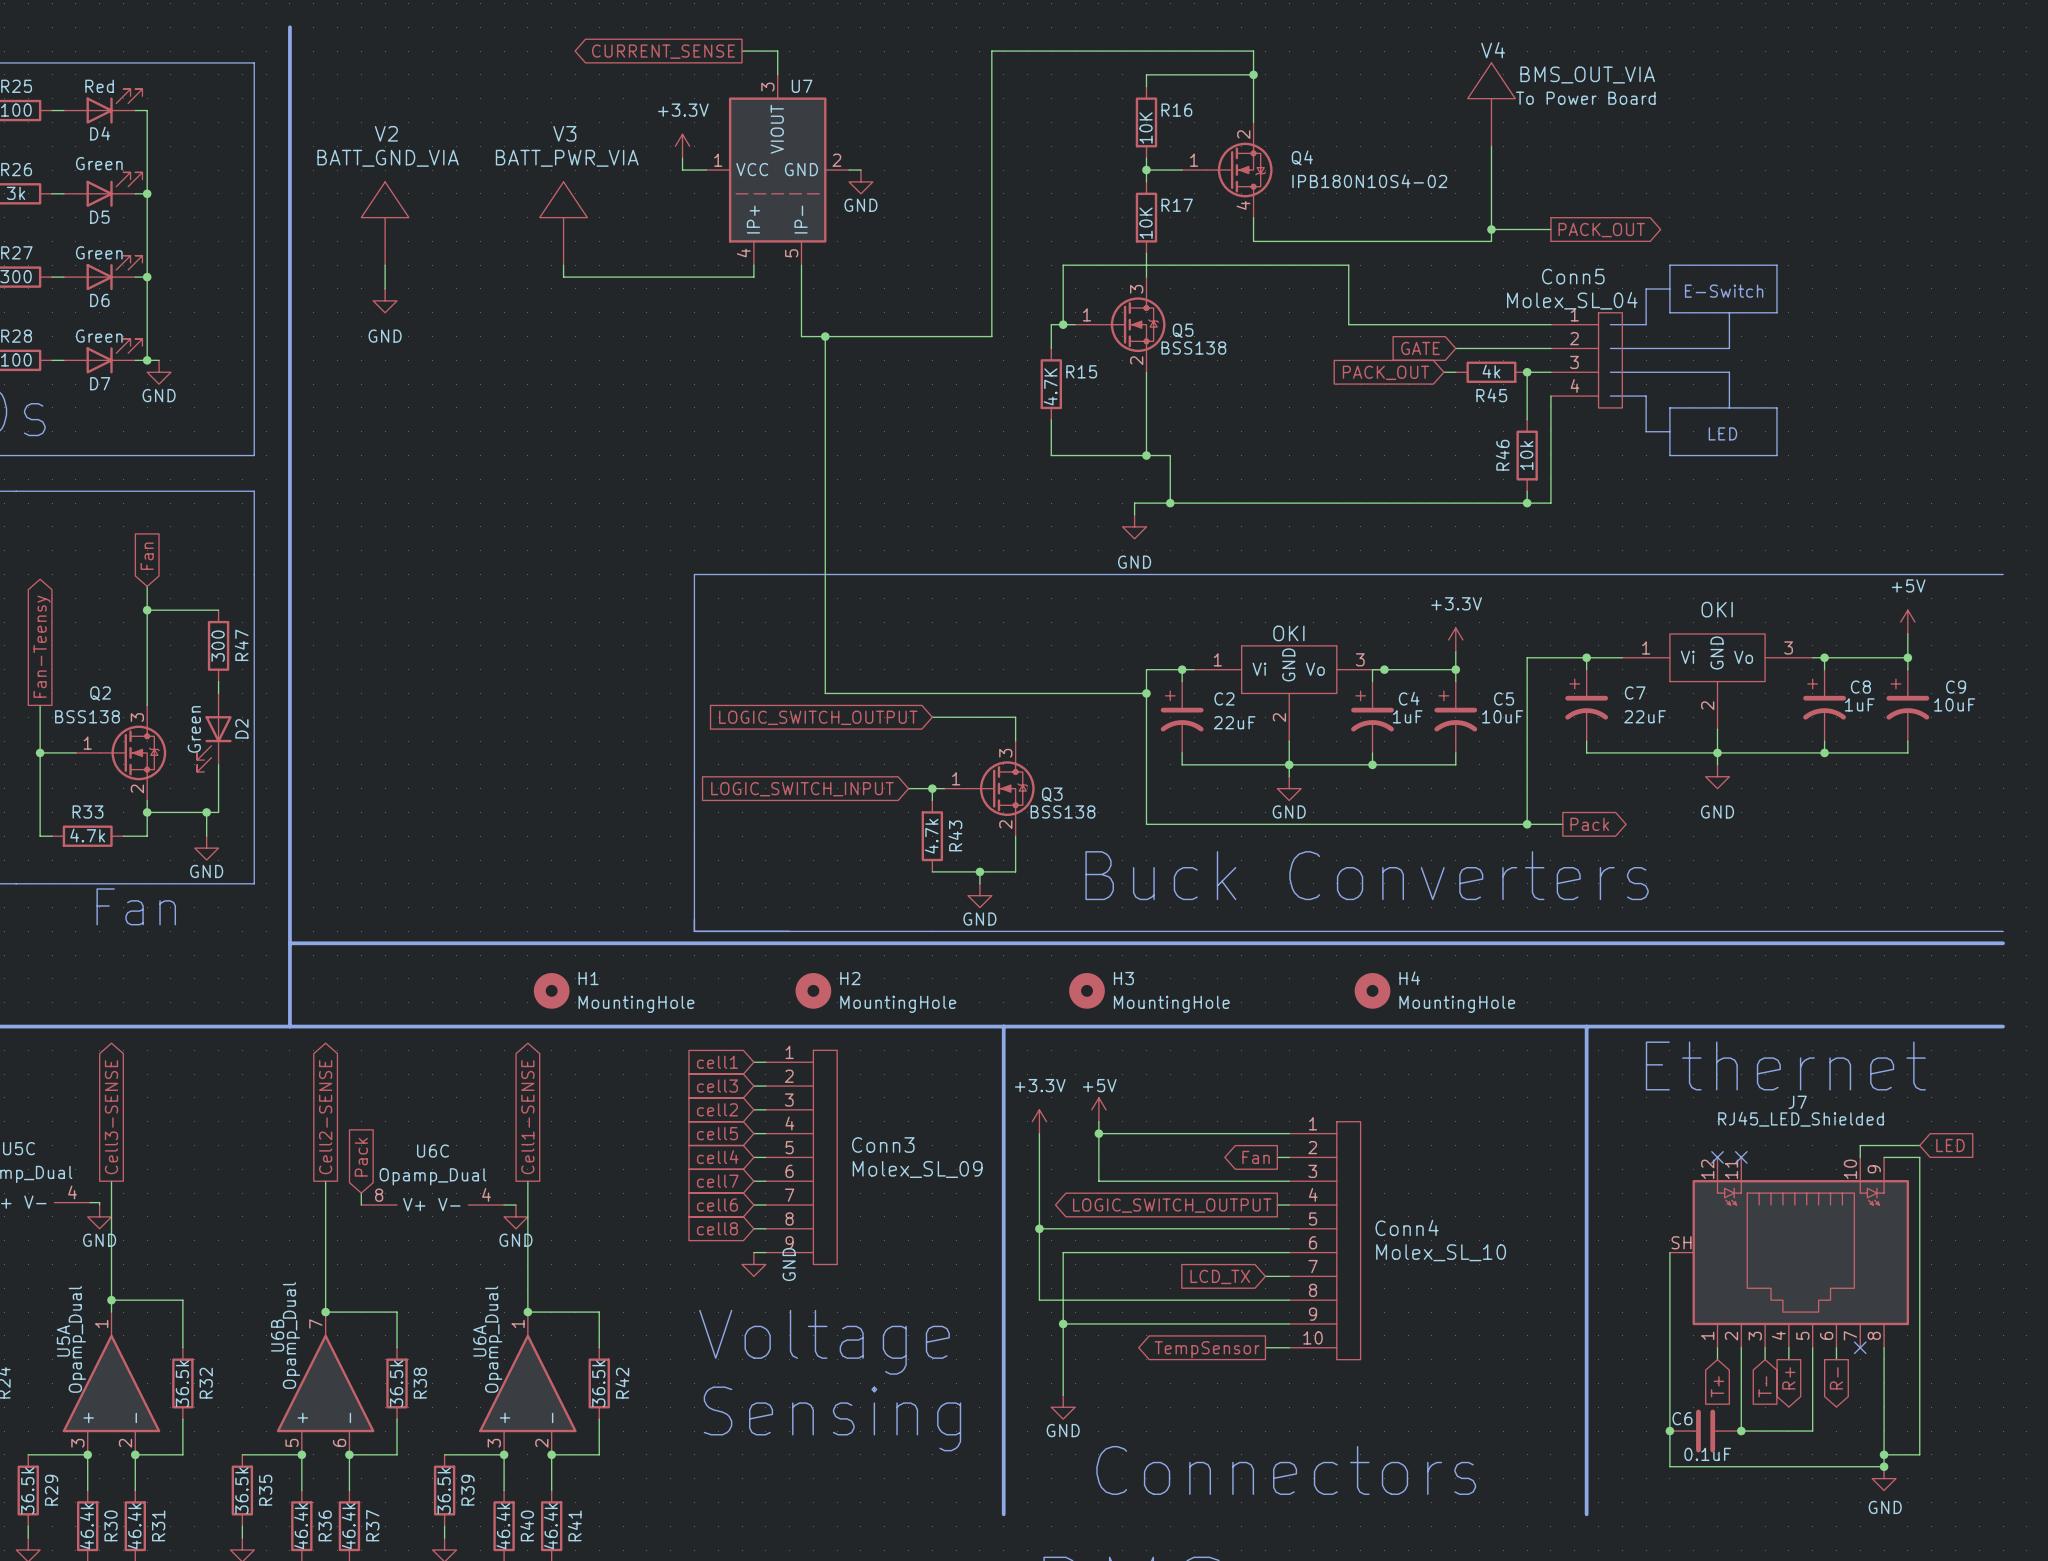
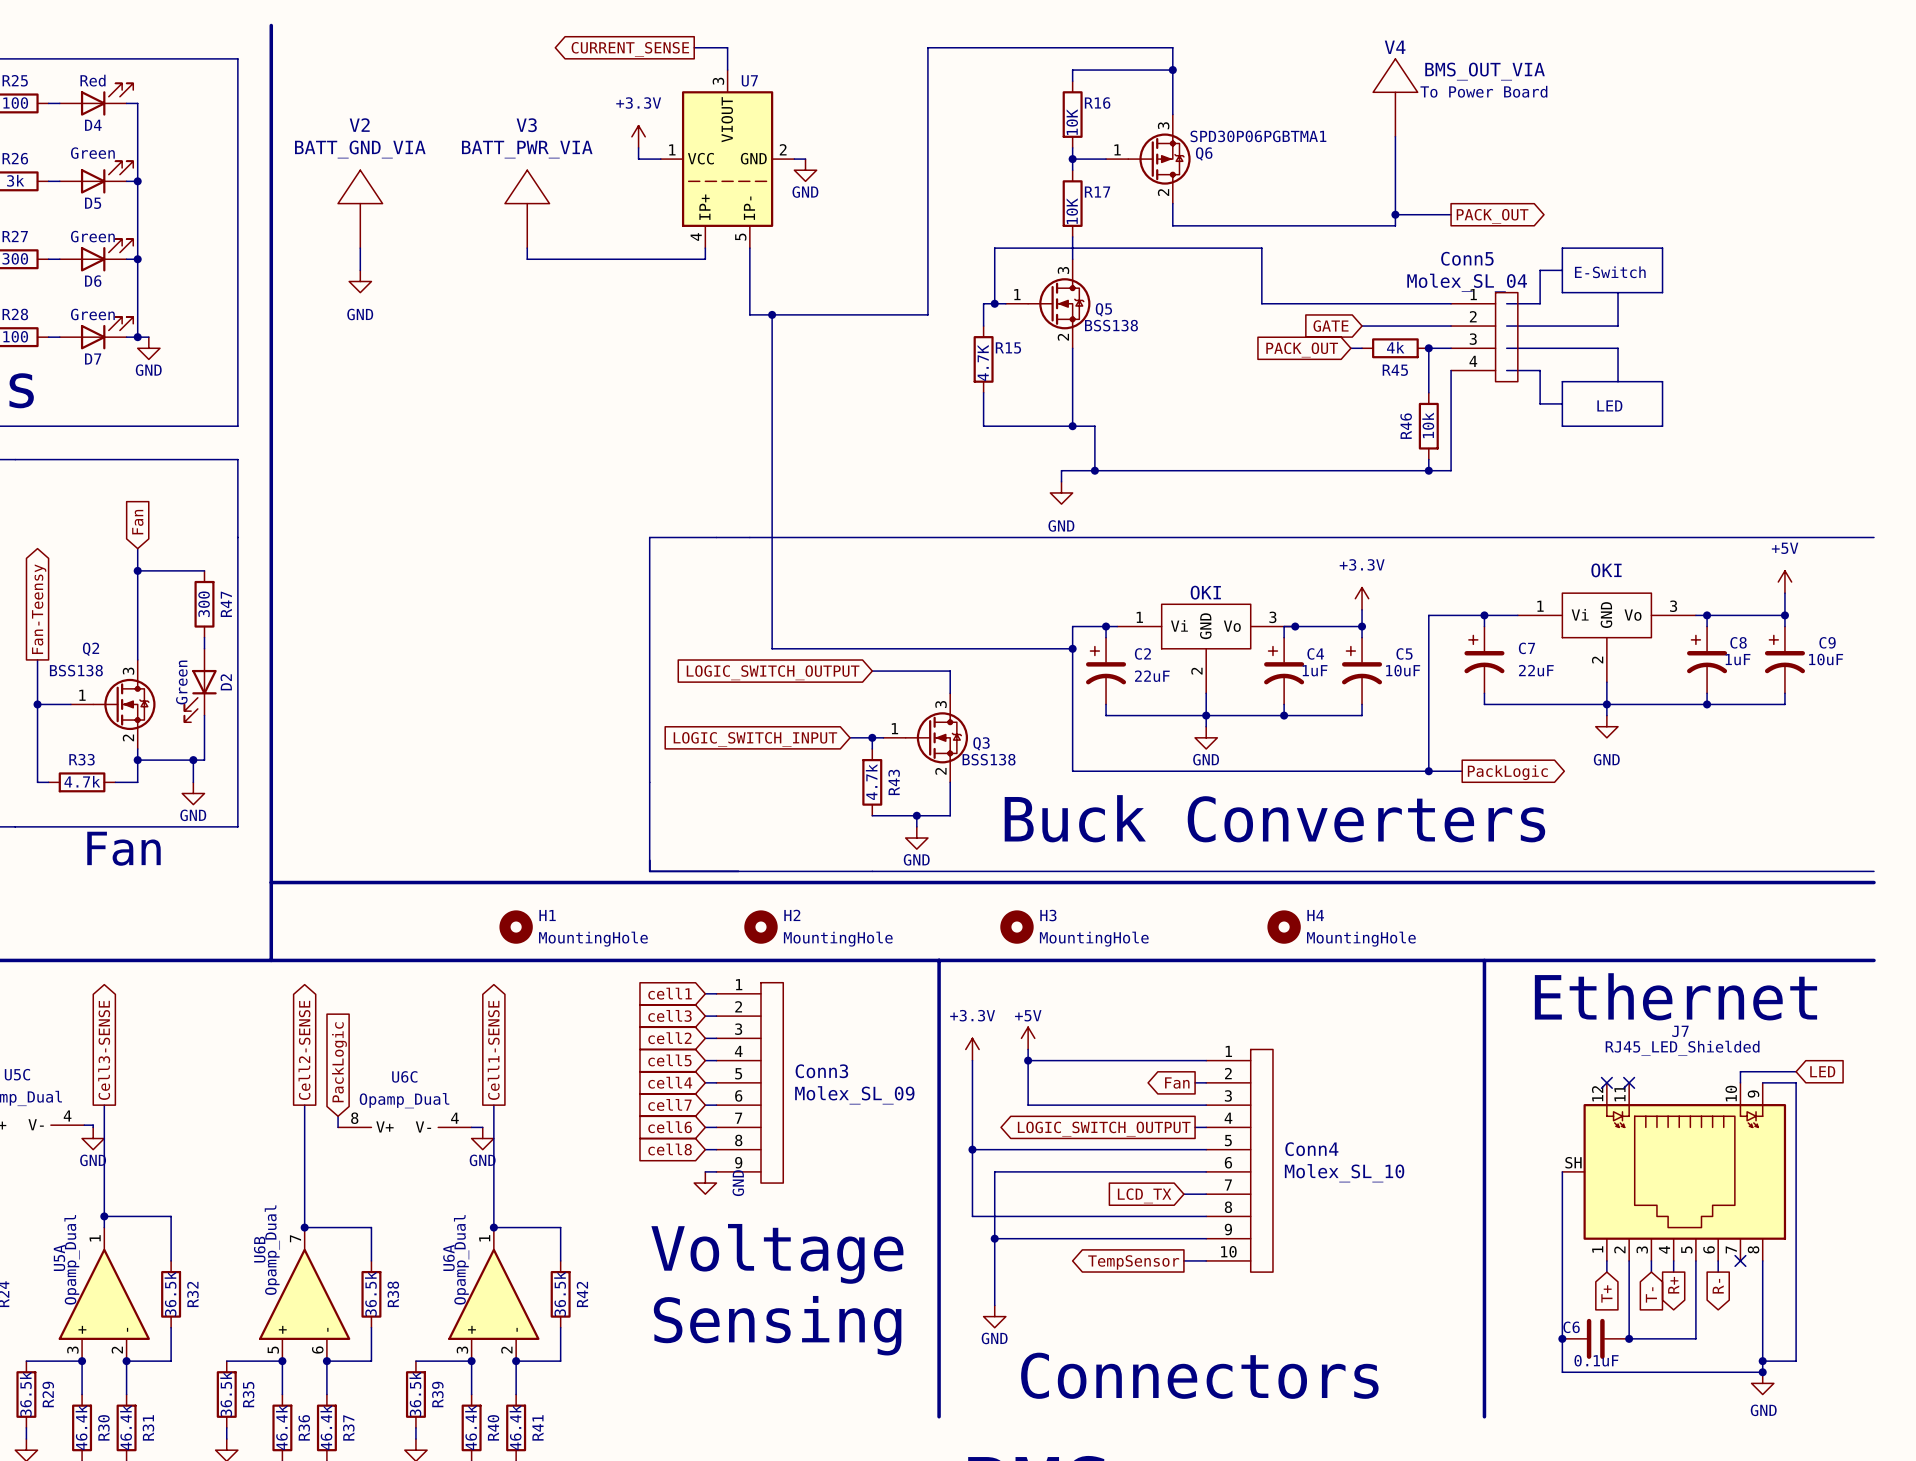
Q4: IPB180N10S4-02 (1227, 170) -> none
Q6: none -> SPD30P06PGBTMA1 (1148, 159)
global label: Pack (1589, 824) -> PackLogic (1507, 772)
global label: Pack (361, 1157) -> PackLogic (339, 1062)

